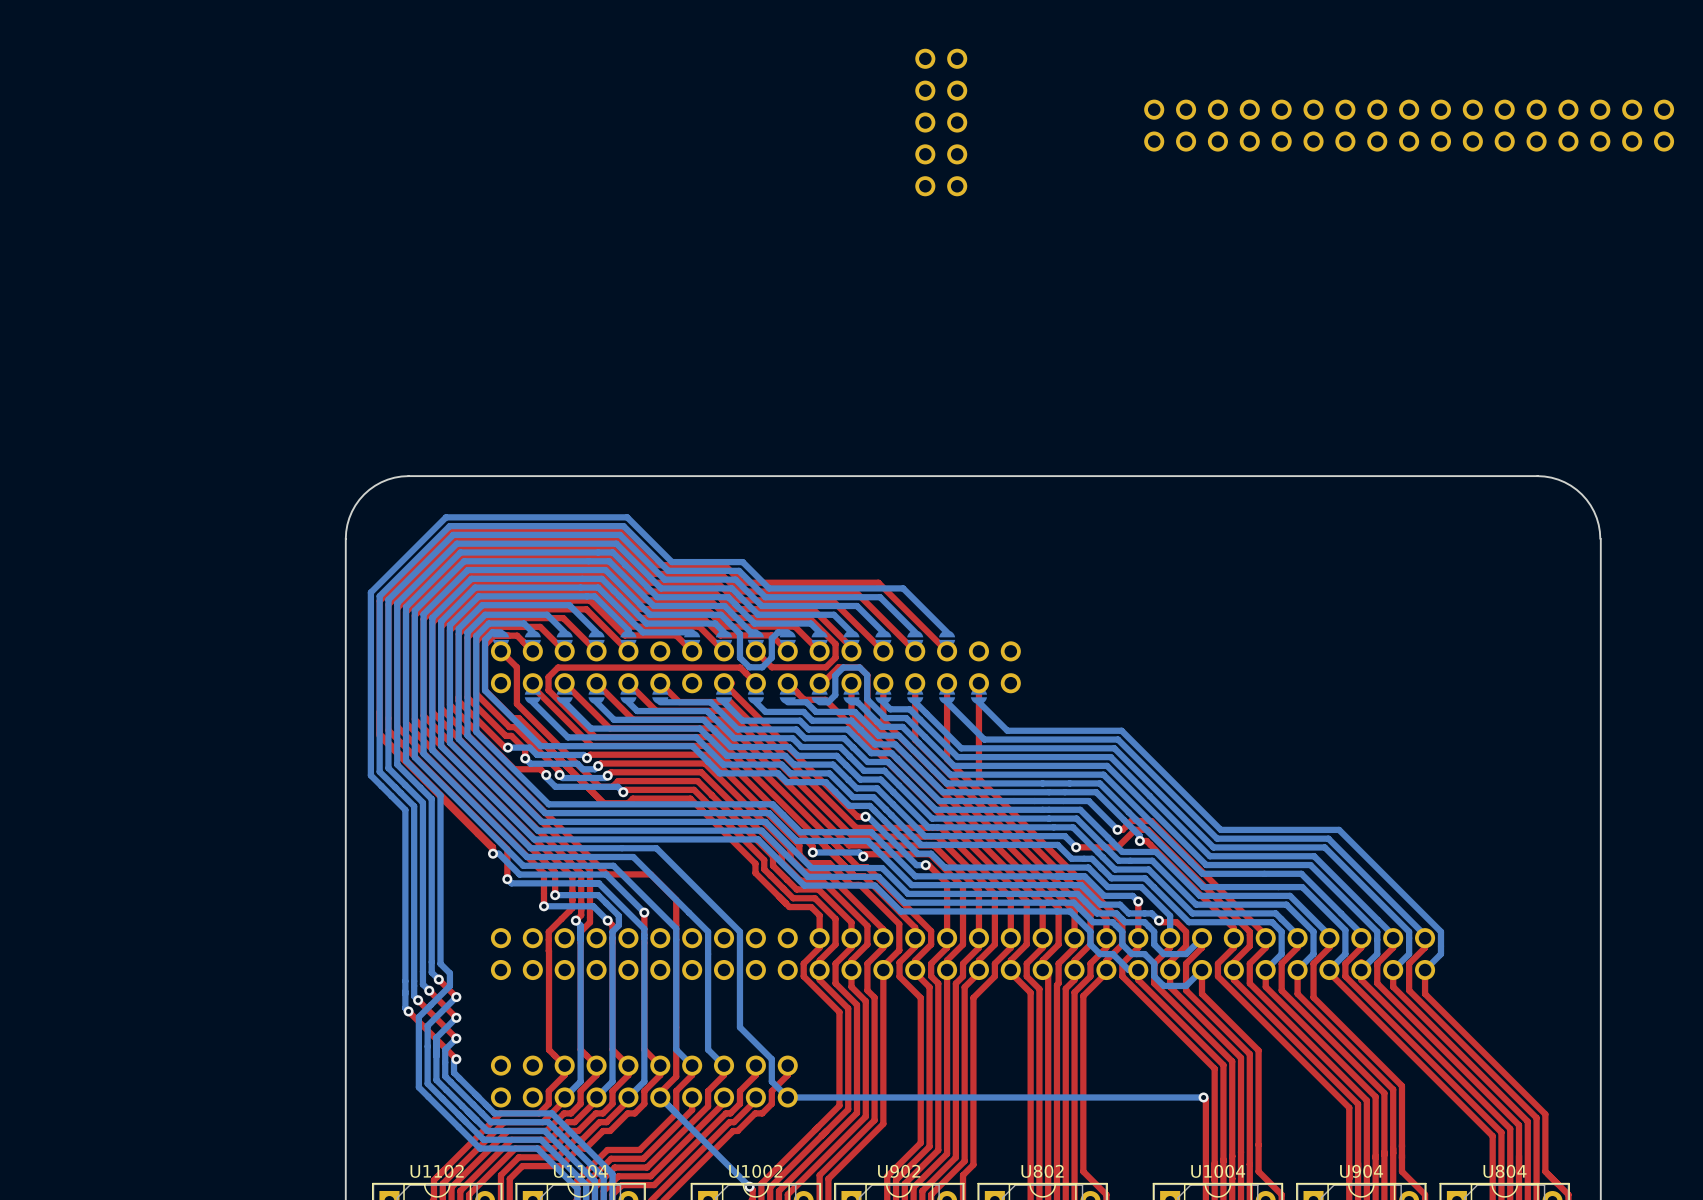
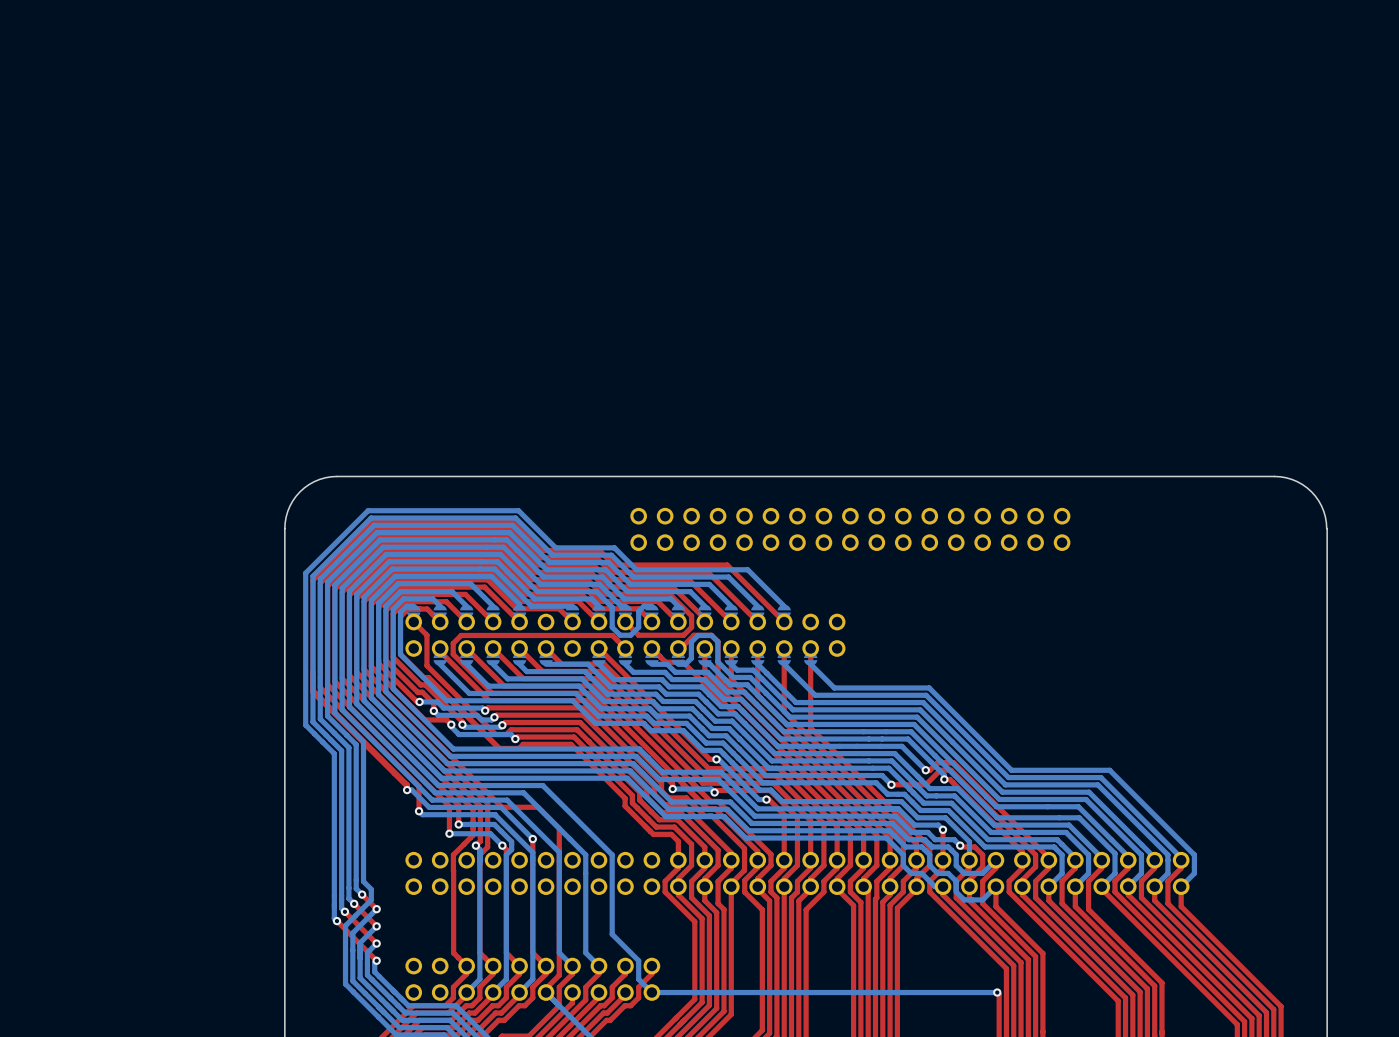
part: (941, 122) -> none
part: (1409, 125) -> none
part: none -> (850, 529)

